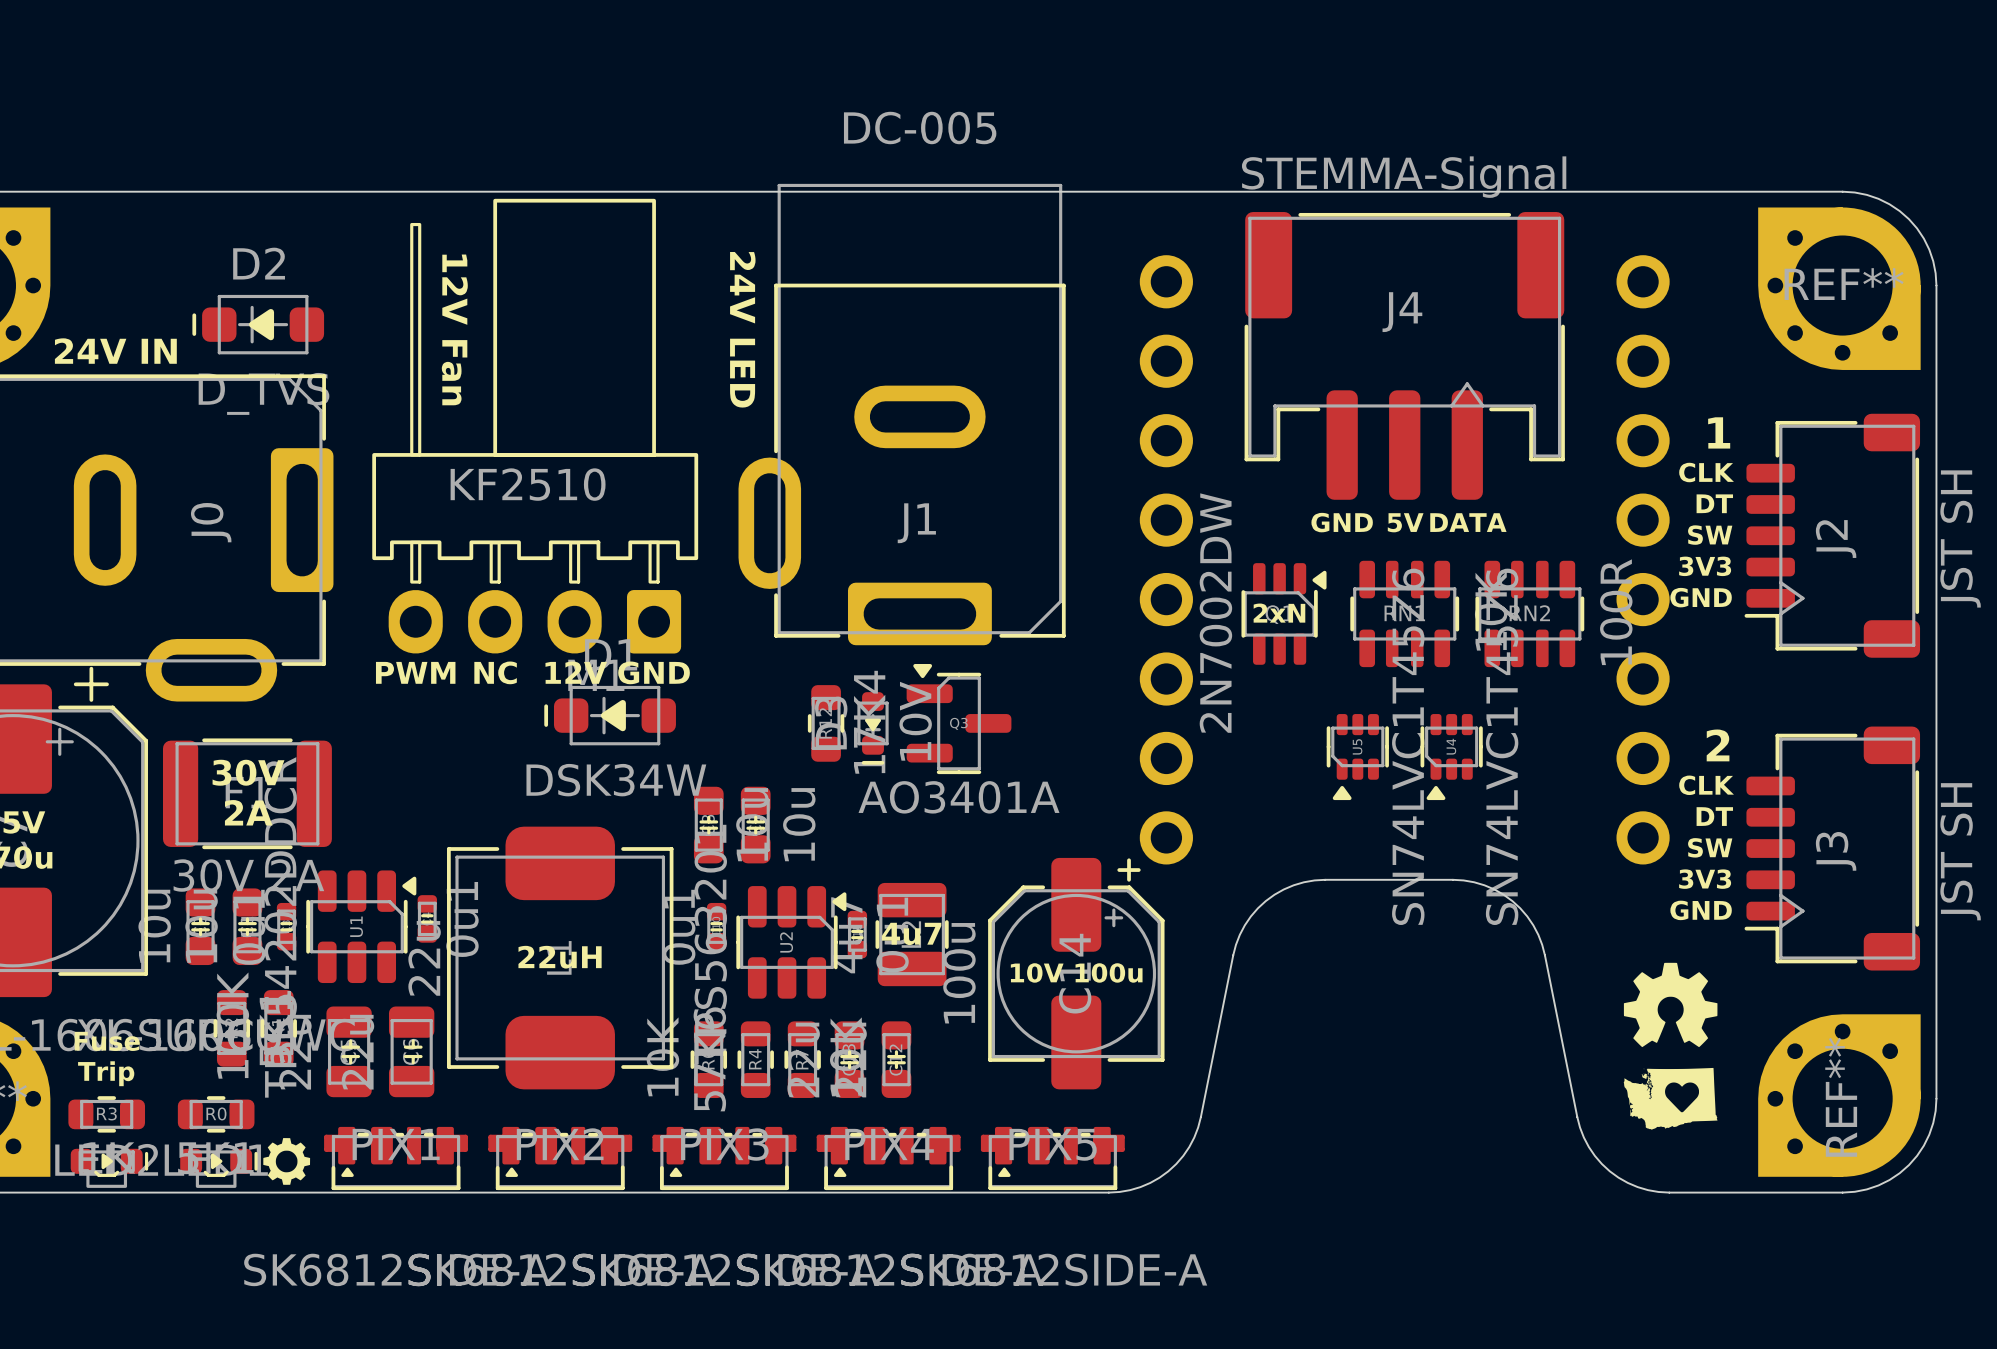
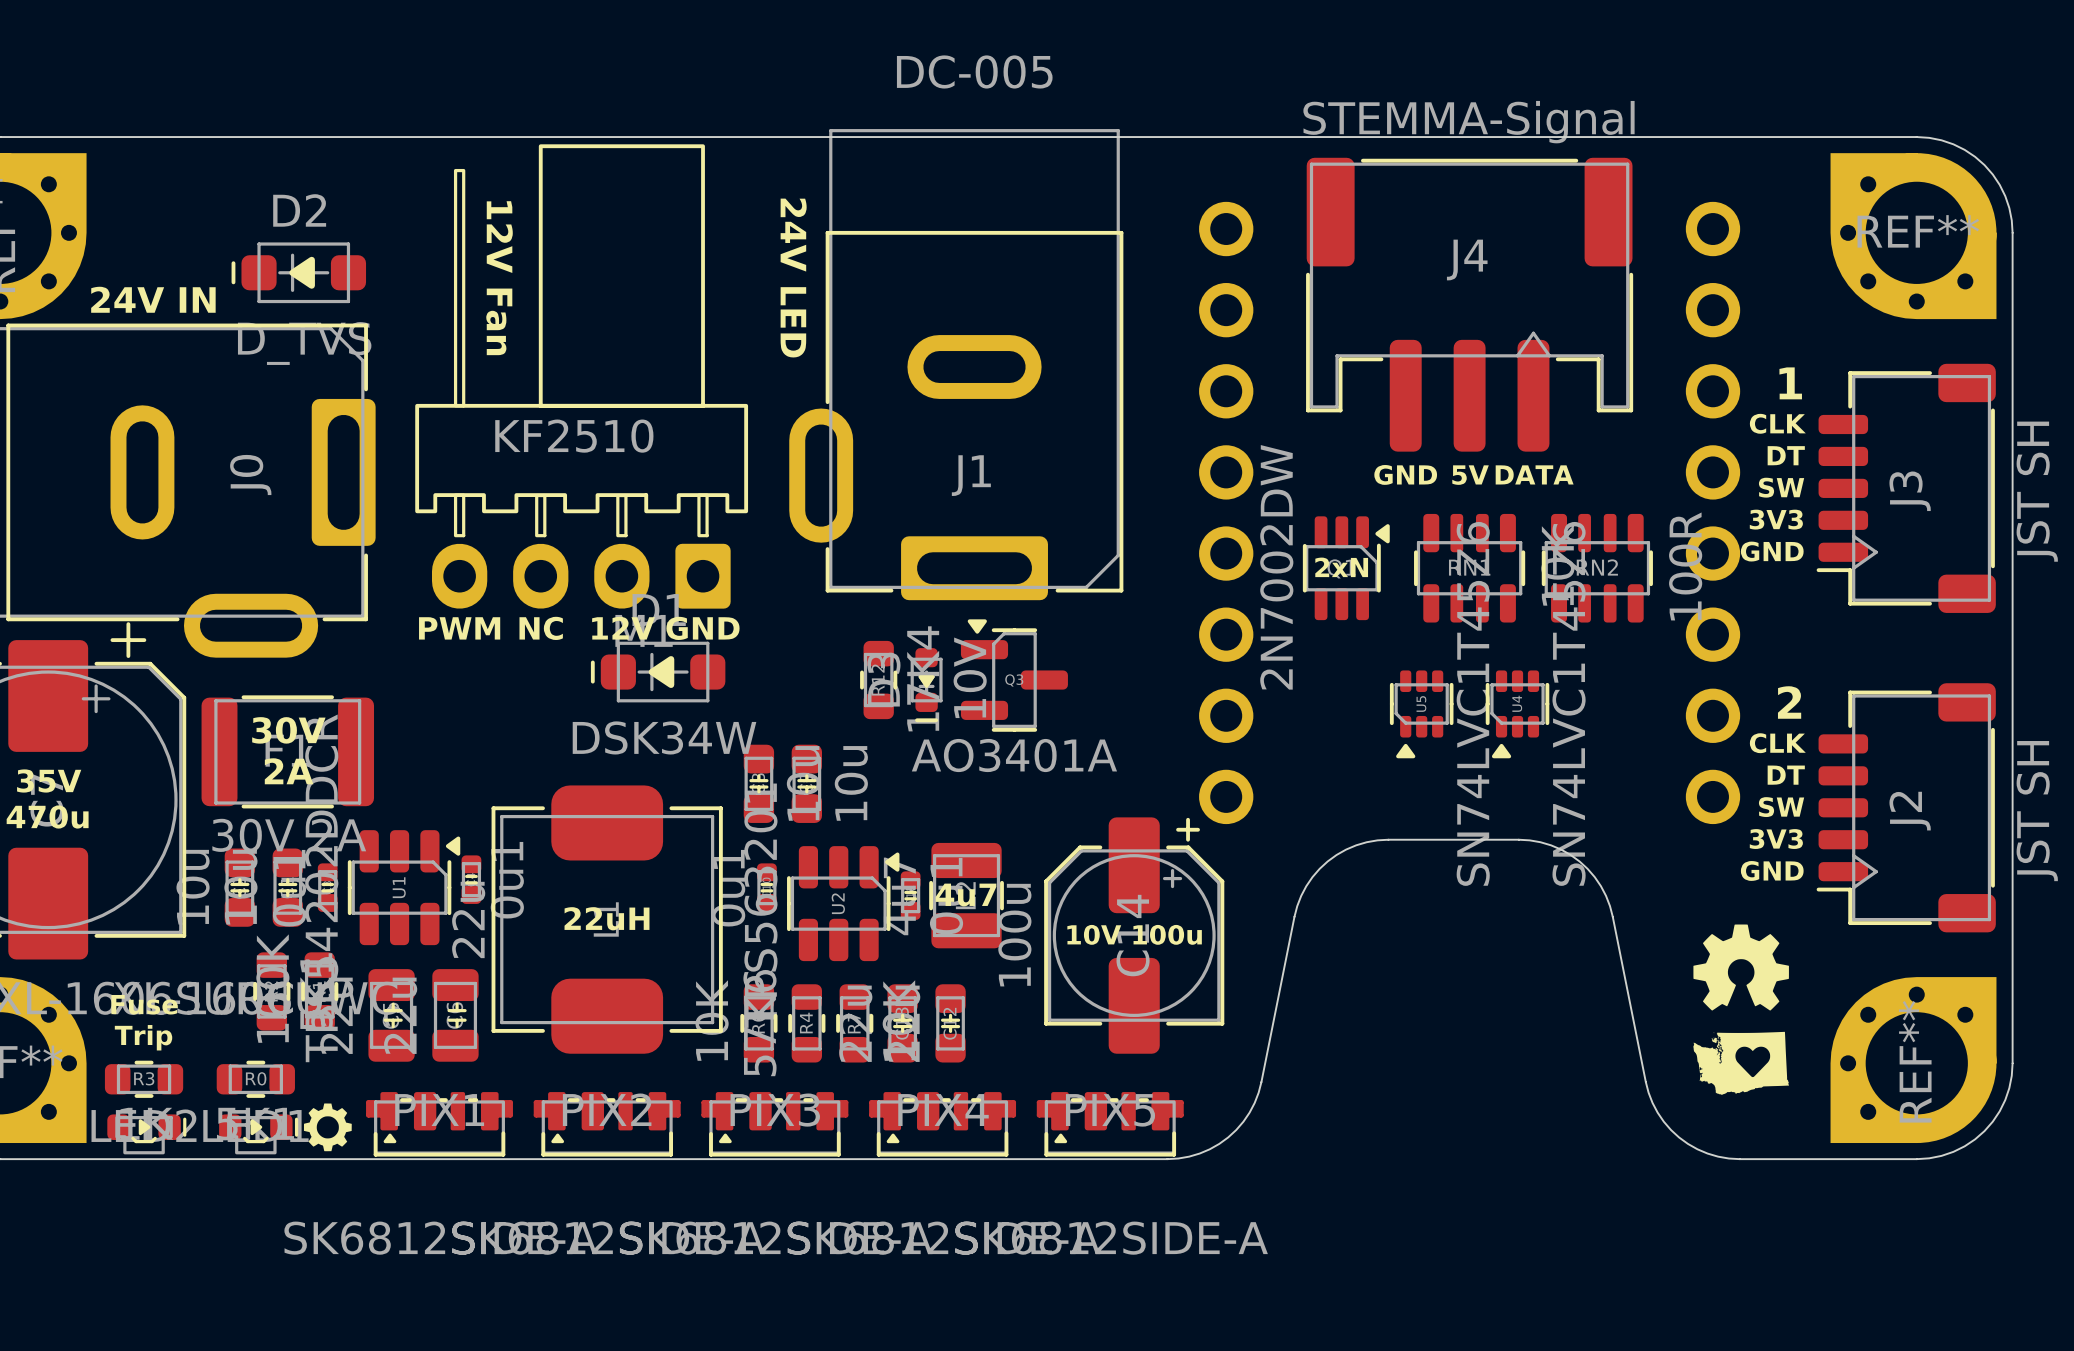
J2 name: J2 (1836, 539) -> J3 (1910, 491)
J3 name: J3 (1836, 851) -> J2 (1910, 811)

